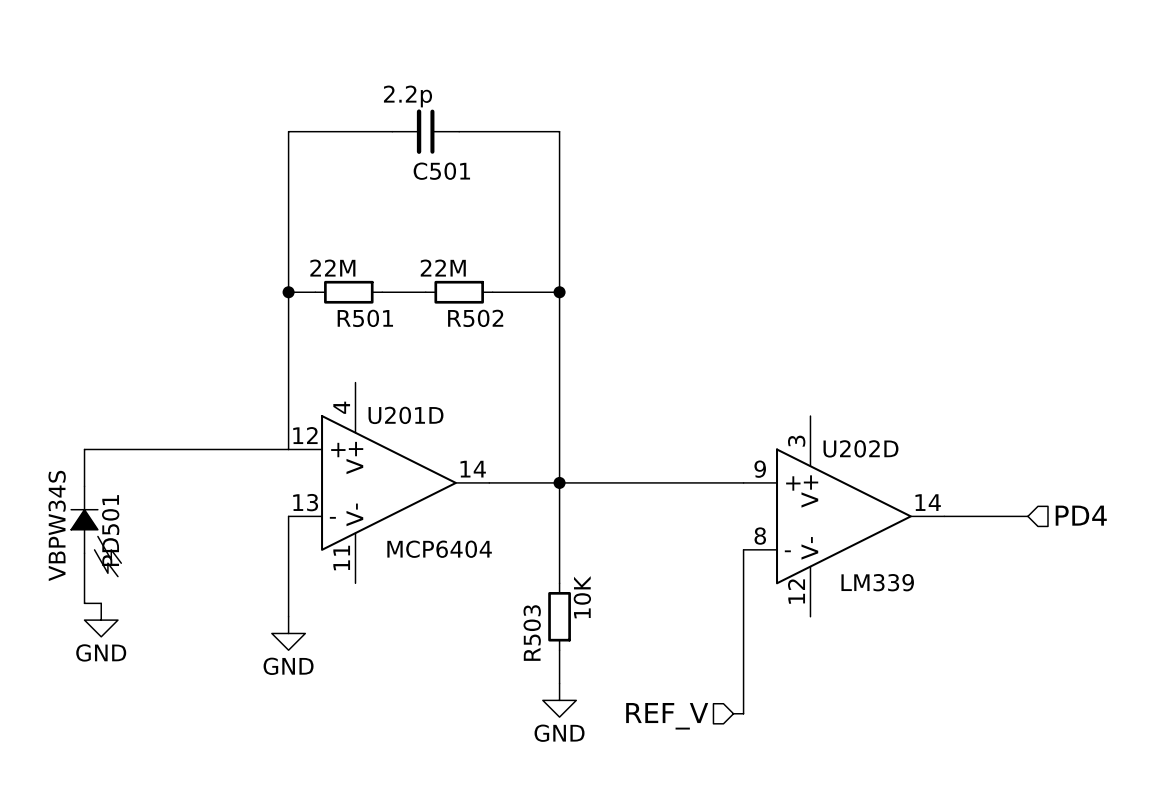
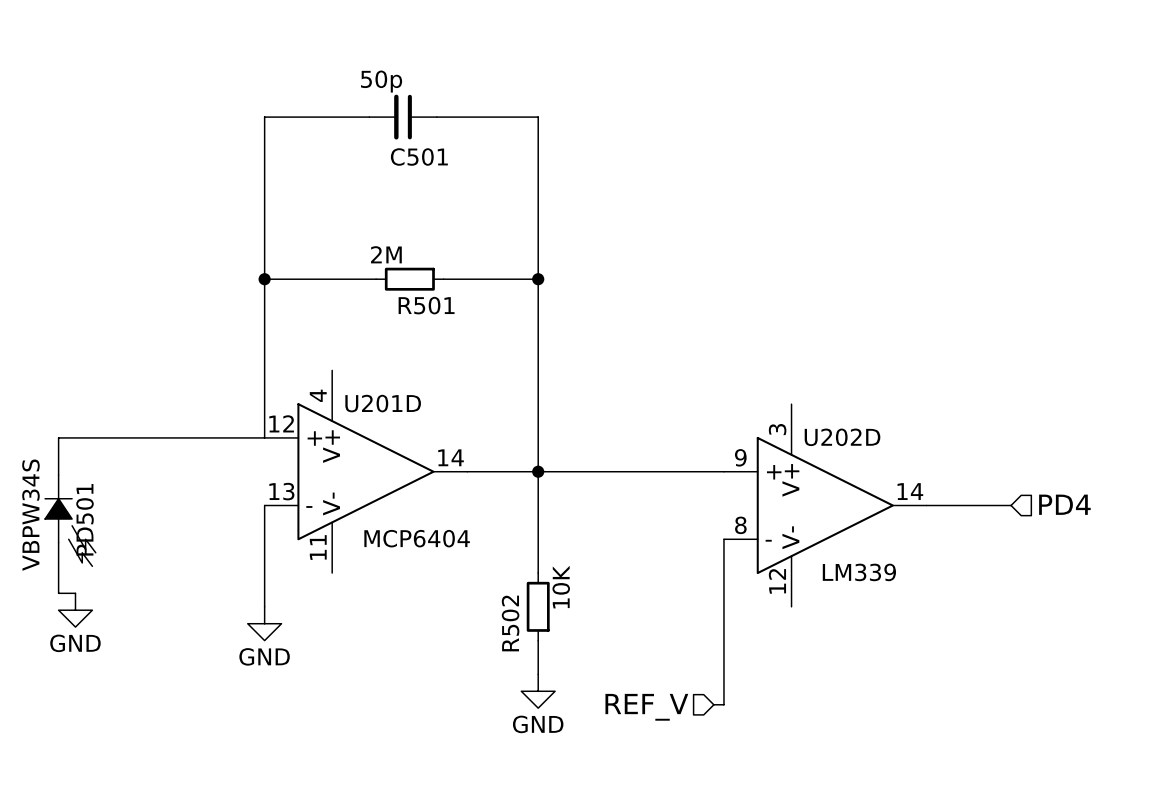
C501 value: 2.2p (407, 96) -> 50p (381, 81)
R501 value: 22M (332, 268) -> 2M (386, 254)
wire: none -> (291, 279) (359, 279)
R501 position: (348, 292) -> (409, 279)
wire: (398, 292) (425, 292) -> (443, 279) (470, 279)
R502: 22M (459, 292) -> none
R503 name: R503 (532, 633) -> R502 (510, 623)

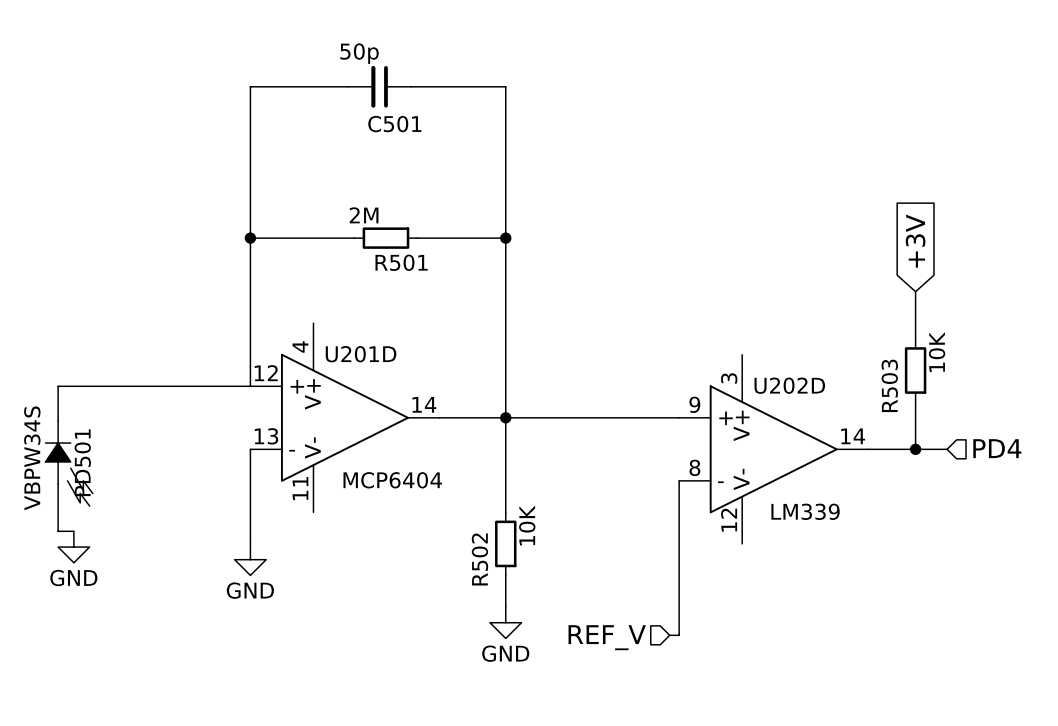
global label: none -> +3V (915, 241)
wire: none -> (915, 291) (915, 339)
R503: none -> 10K (915, 370)
wire: none -> (915, 402) (915, 449)
junction: none -> (915, 449)

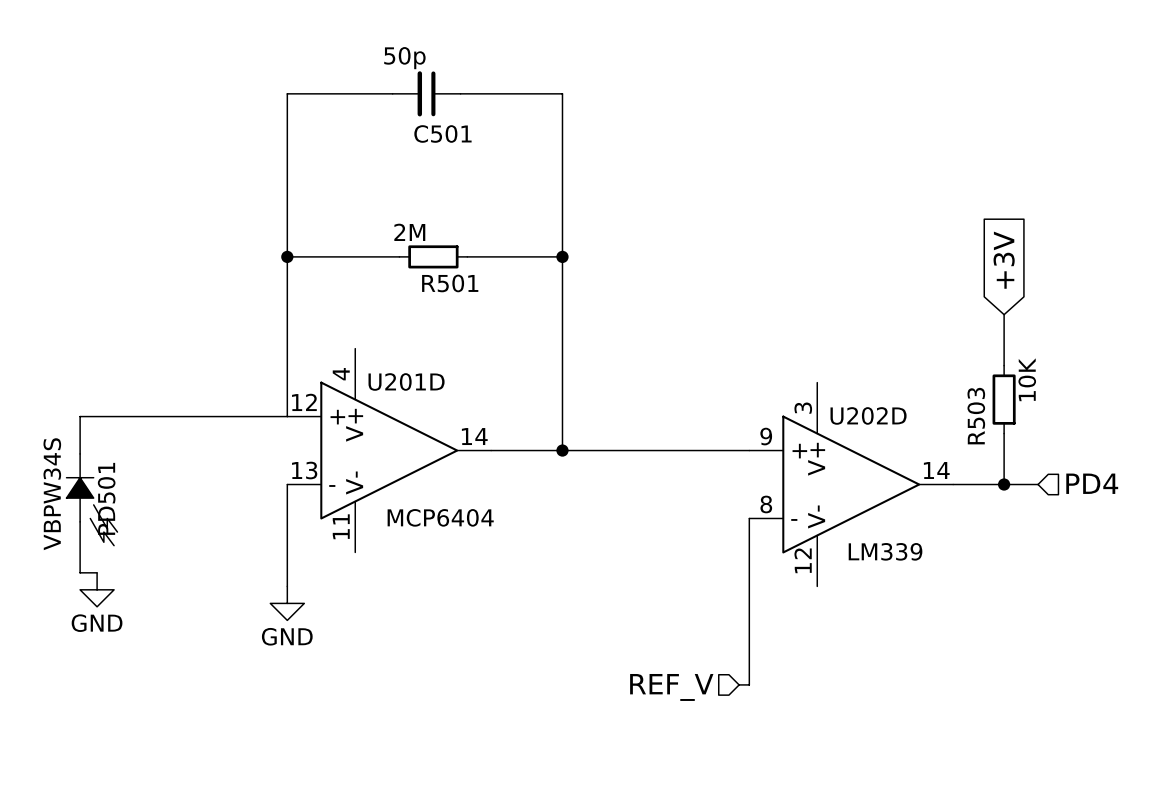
wire: (505, 417) (505, 512) -> none
R502: 10K (505, 543) -> none
wire: (505, 575) (505, 606) -> none
power symbol: GND (505, 622) -> none

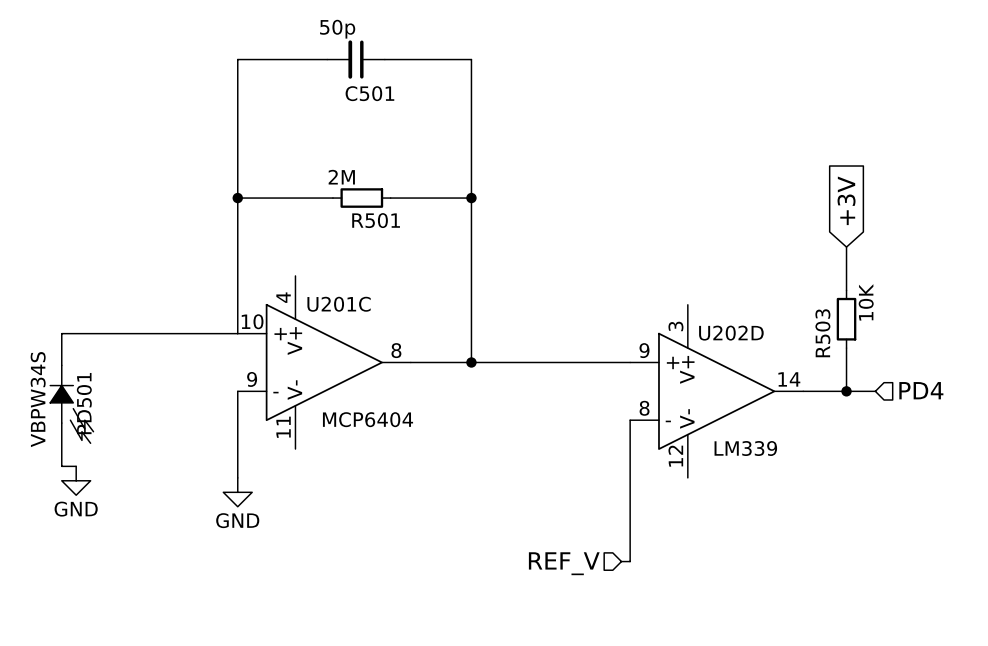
U201D name: U201D (406, 381) -> U201C (339, 304)
U201D pin number: 12 (304, 402) -> 10 (252, 321)
U201D pin number: 14 (474, 436) -> 8 (396, 350)
U201D pin number: 13 (304, 470) -> 9 (252, 379)

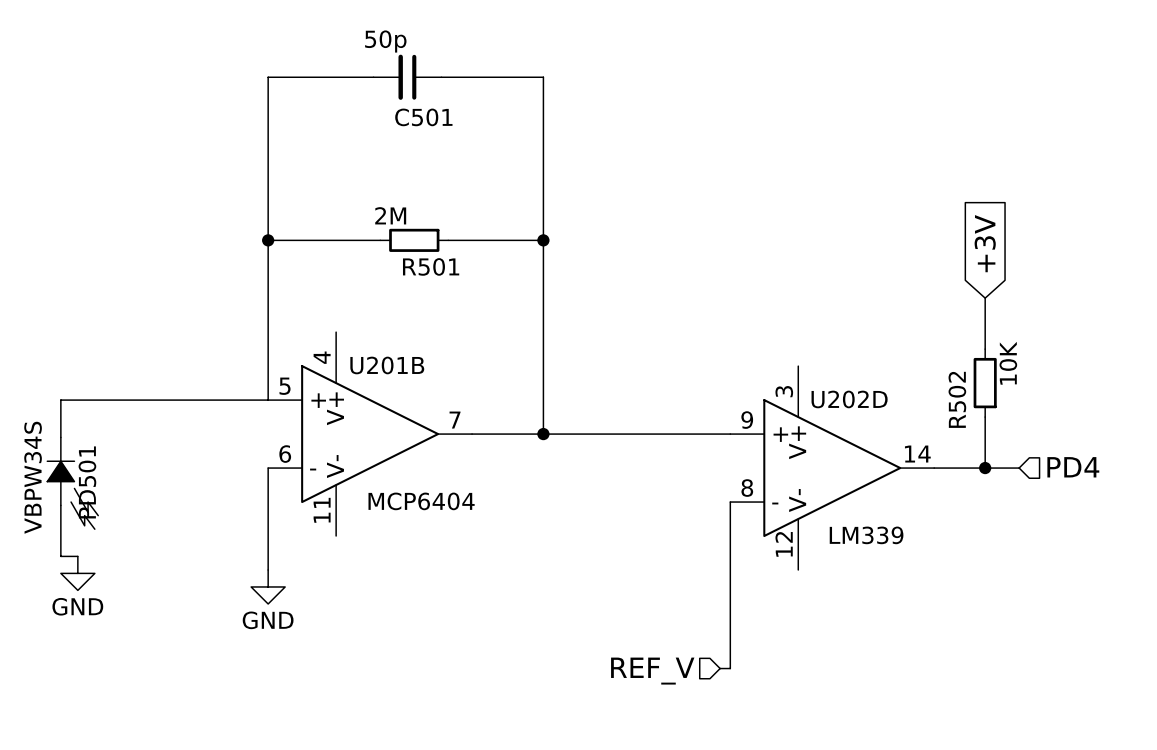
U201C name: U201C (339, 304) -> U201B (387, 365)
U201C pin number: 10 (252, 321) -> 5 (285, 386)
R503 name: R503 (822, 333) -> R502 (957, 399)
U201C pin number: 8 (396, 350) -> 7 (455, 420)
U201C pin number: 9 (252, 379) -> 6 (285, 454)

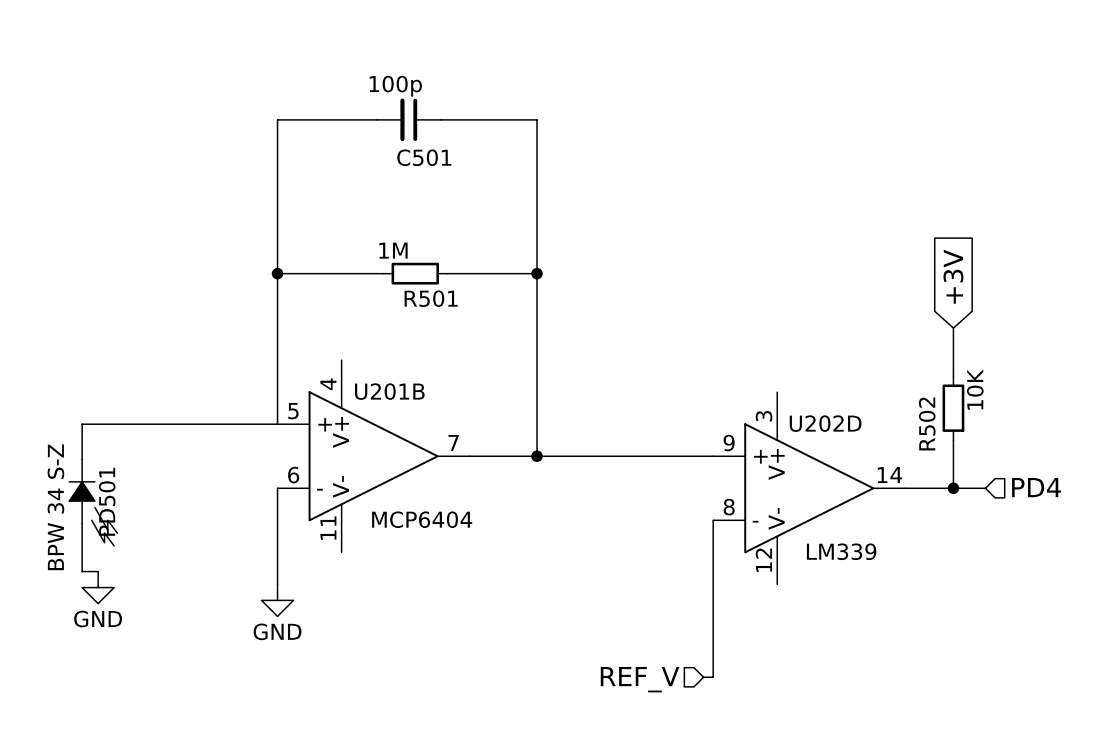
C501 value: 50p (385, 41) -> 100p (395, 86)
R501 value: 2M (390, 215) -> 1M (393, 250)
PD501 value: VBPW34S (33, 477) -> BPW 34 S-Z (55, 507)

